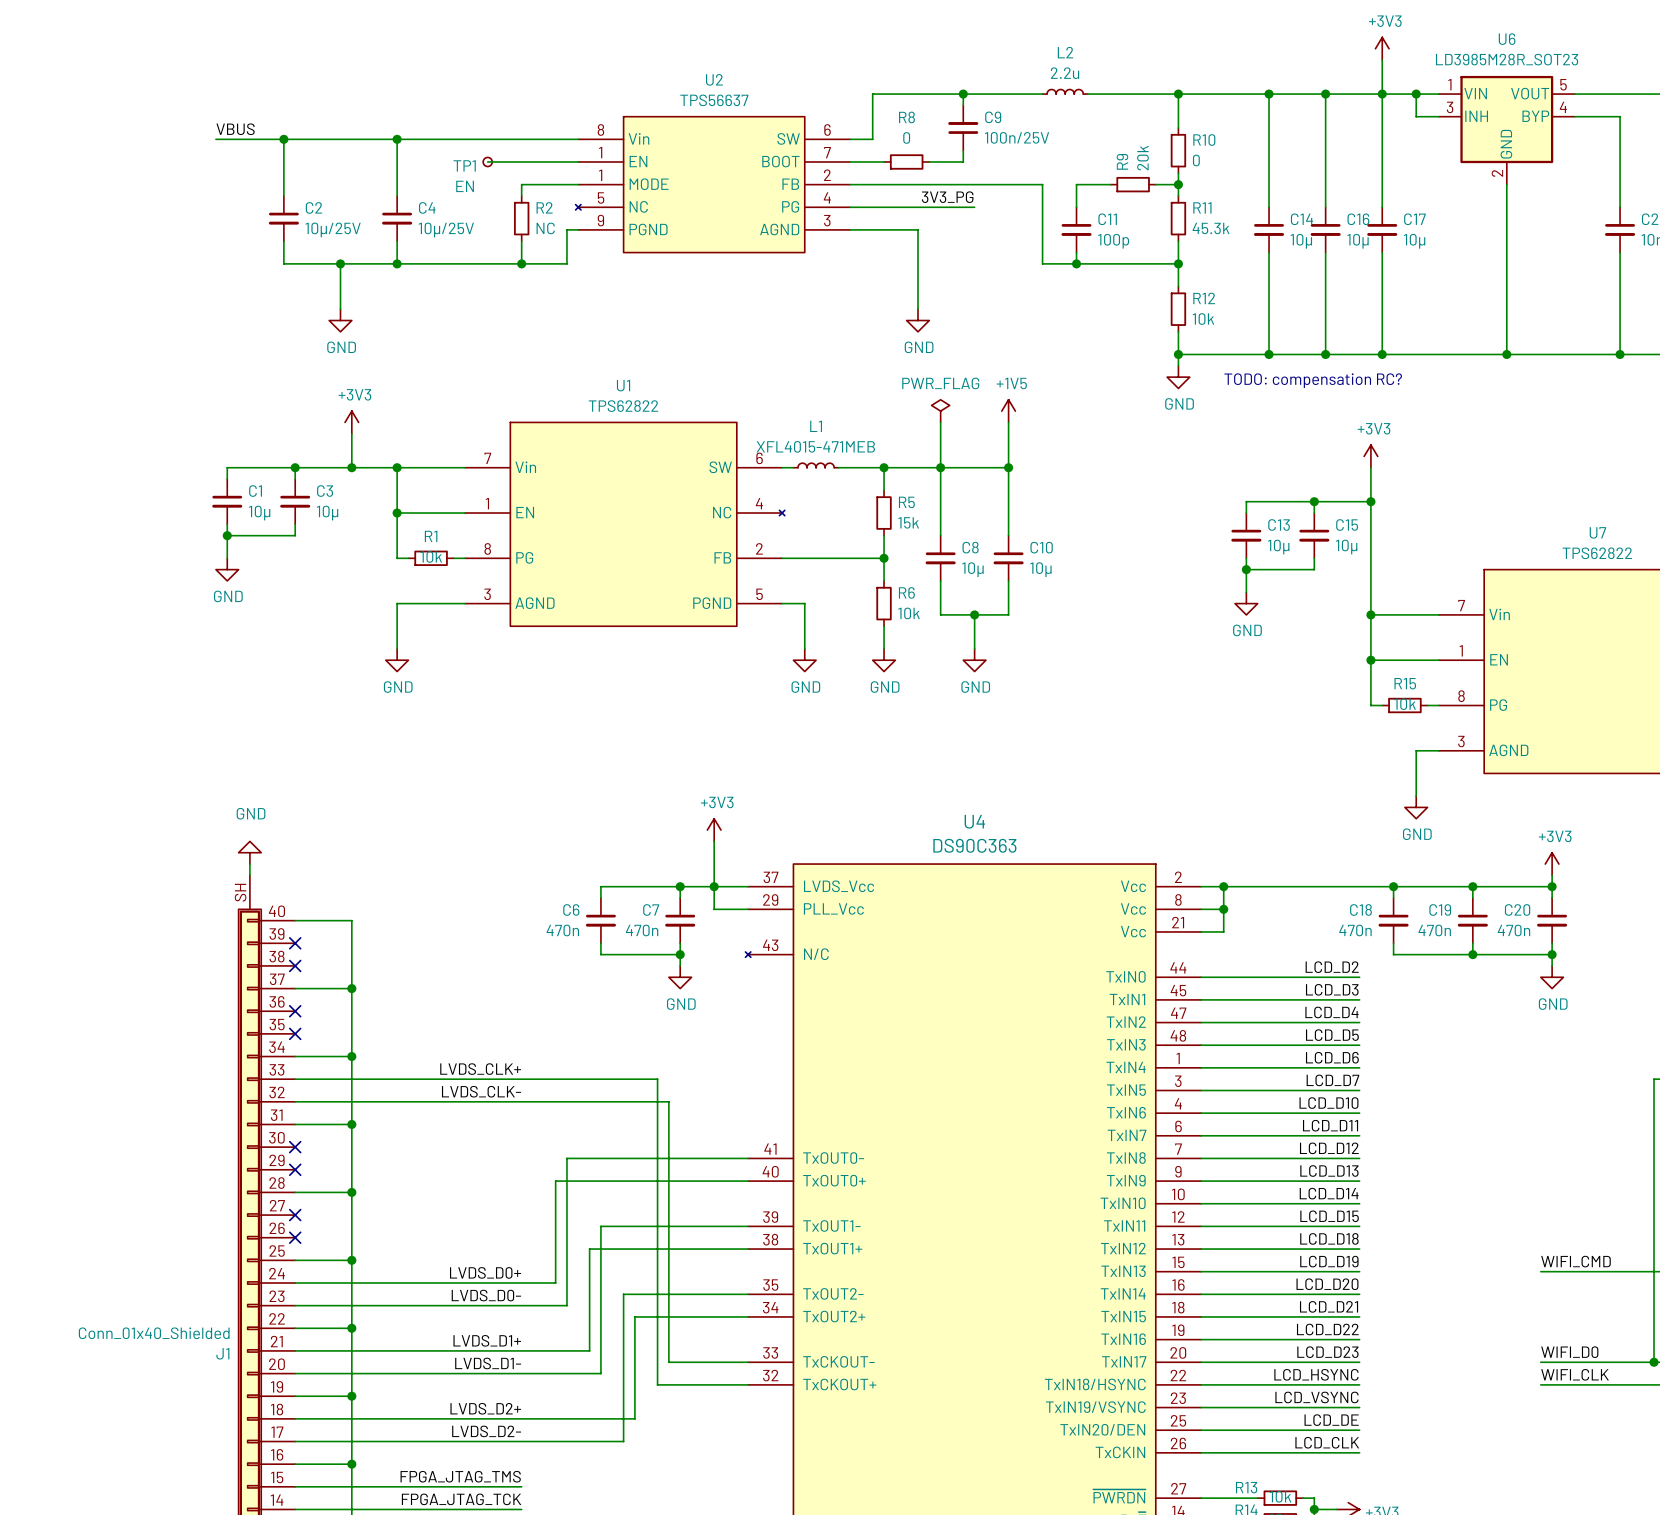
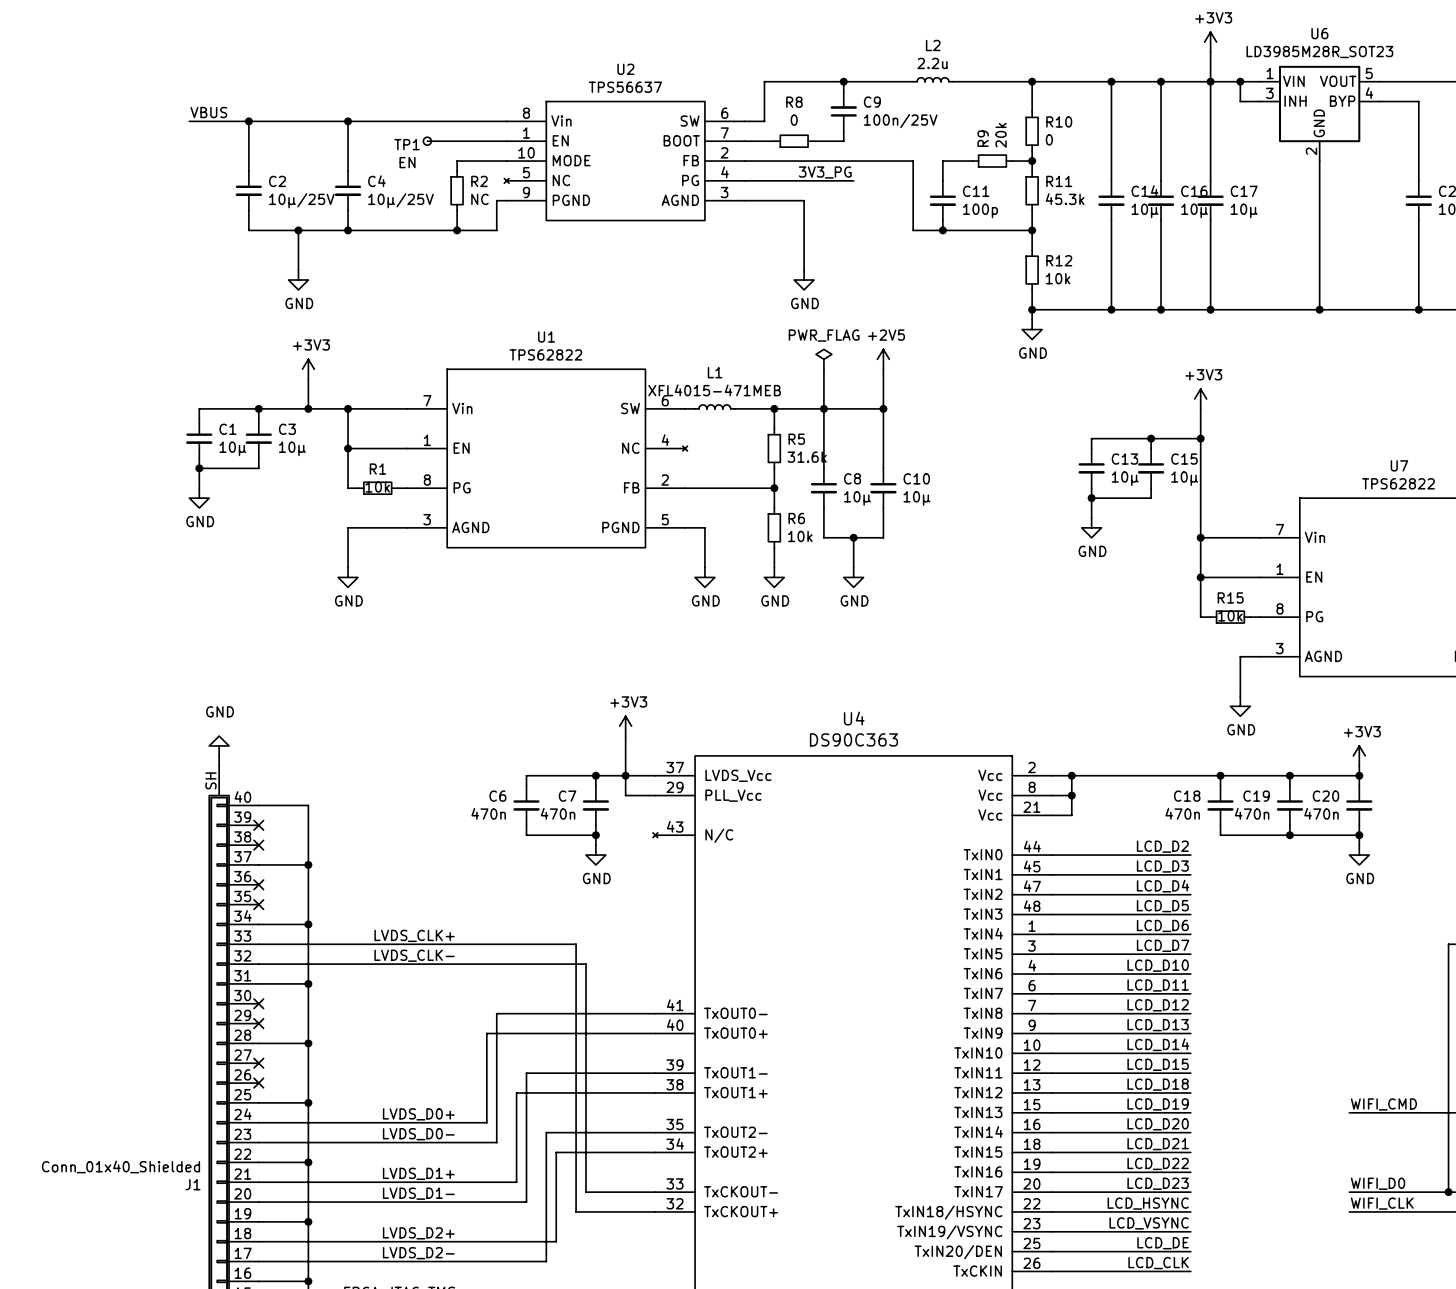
U2 pin number: 1 (600, 175) -> 10 (526, 152)
text: TODO: compensation RC? (1313, 380) -> none
power symbol: +1V5 (1008, 411) -> +2V5 (883, 359)
R5 value: 15k (908, 522) -> 31.6k (807, 457)

